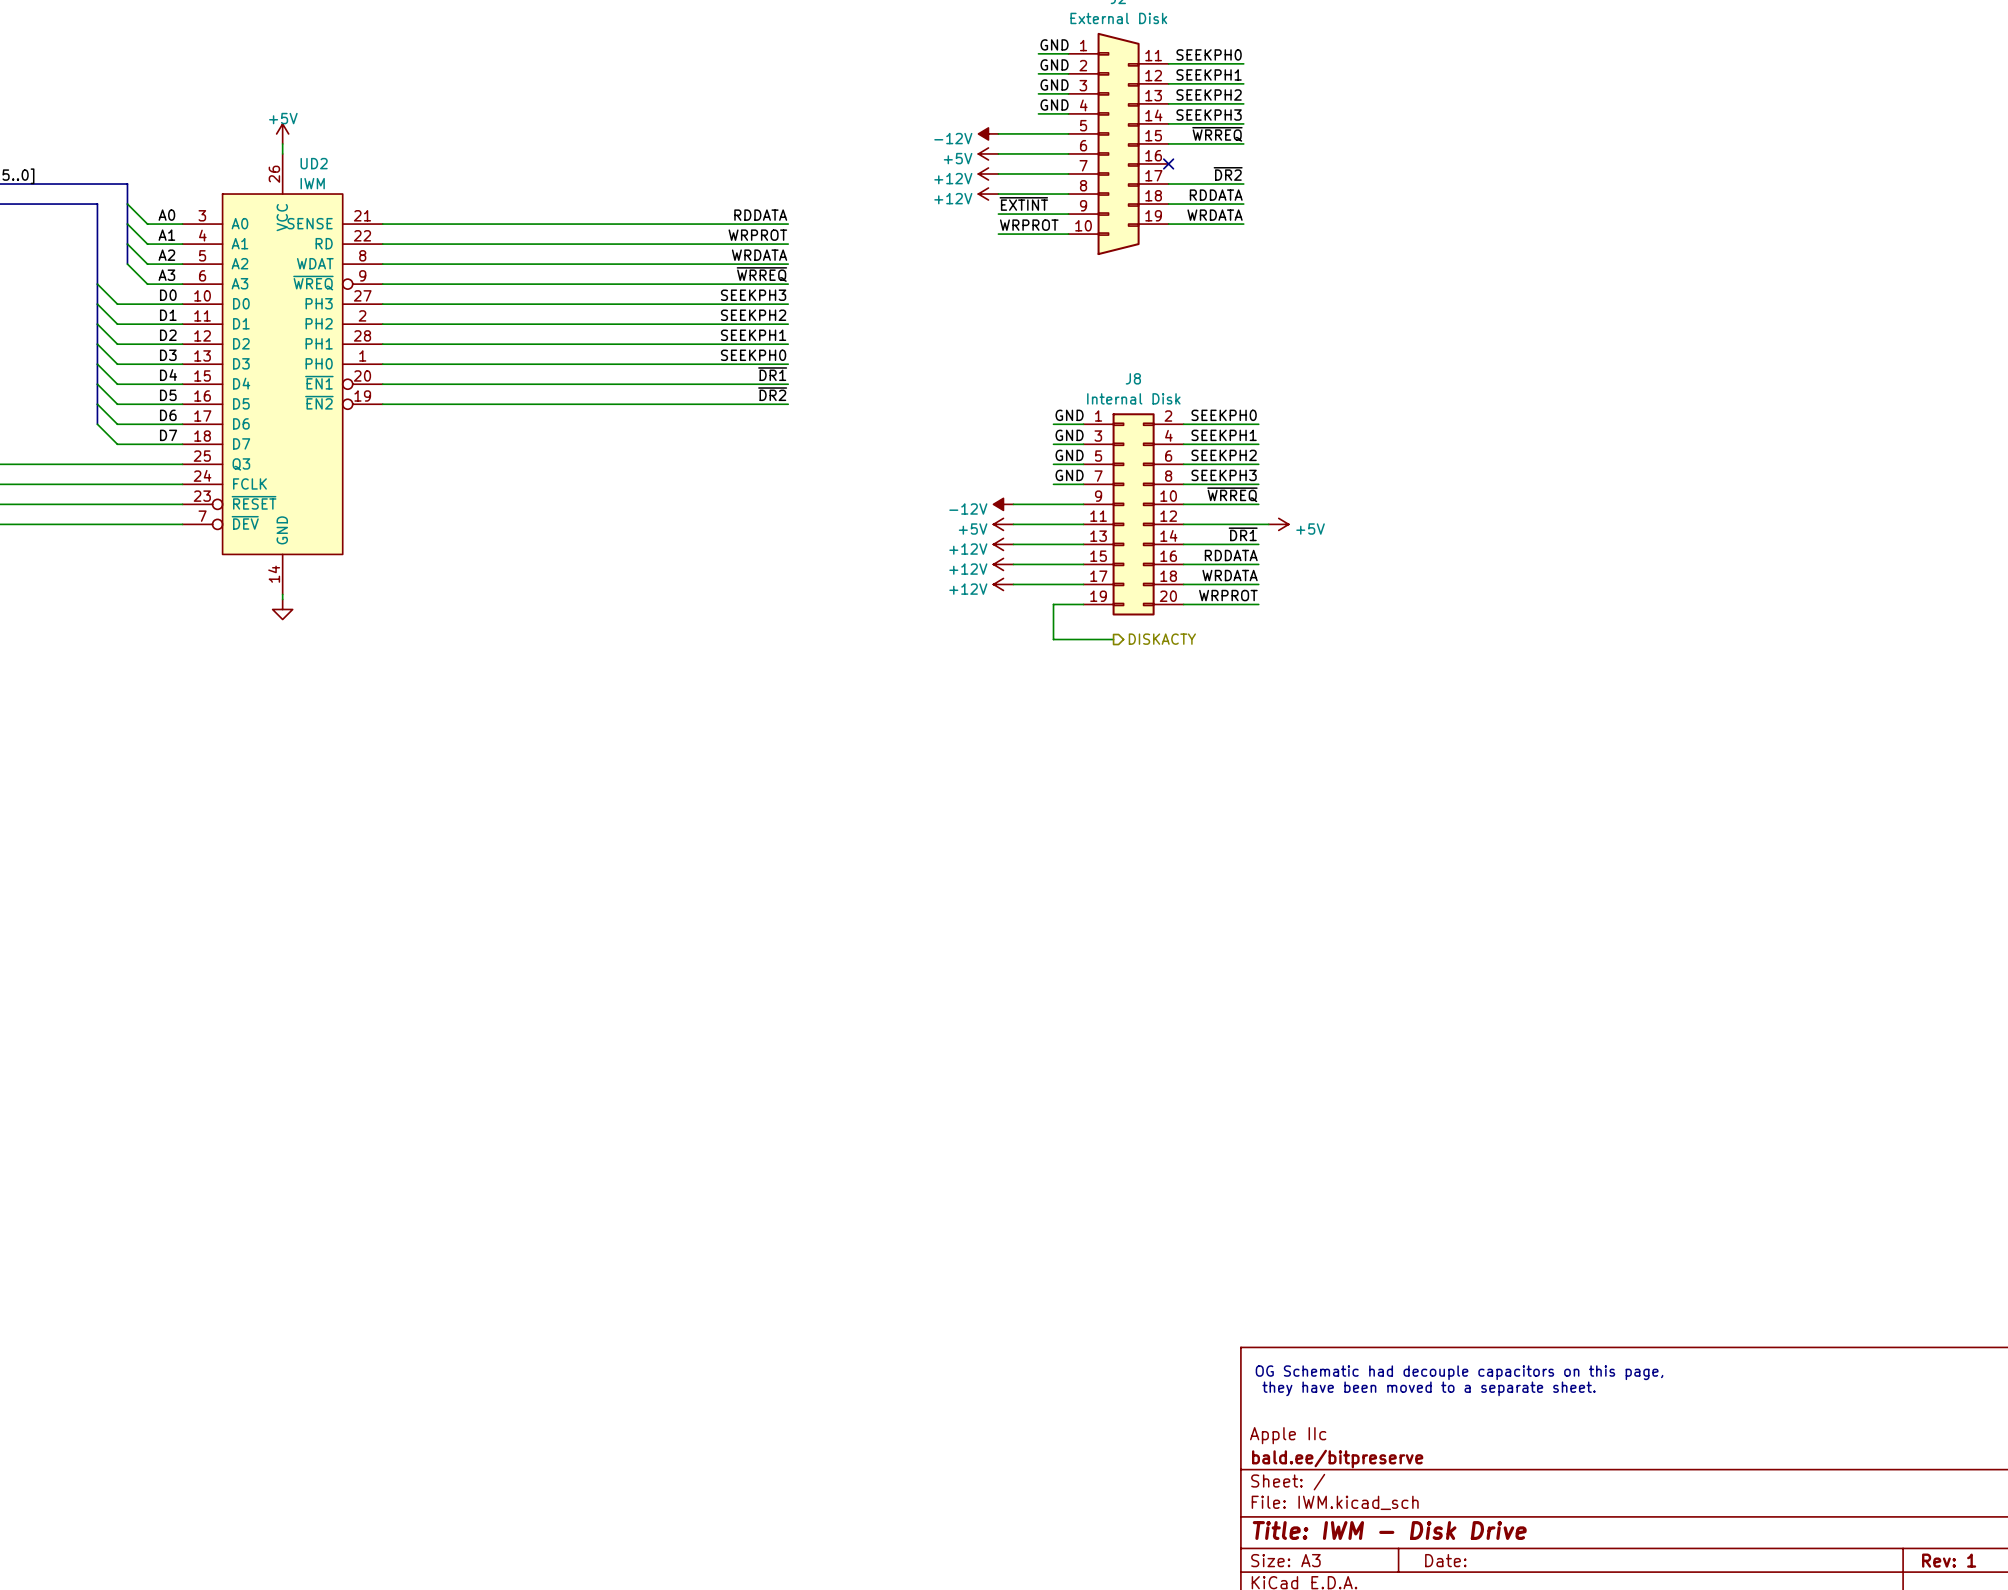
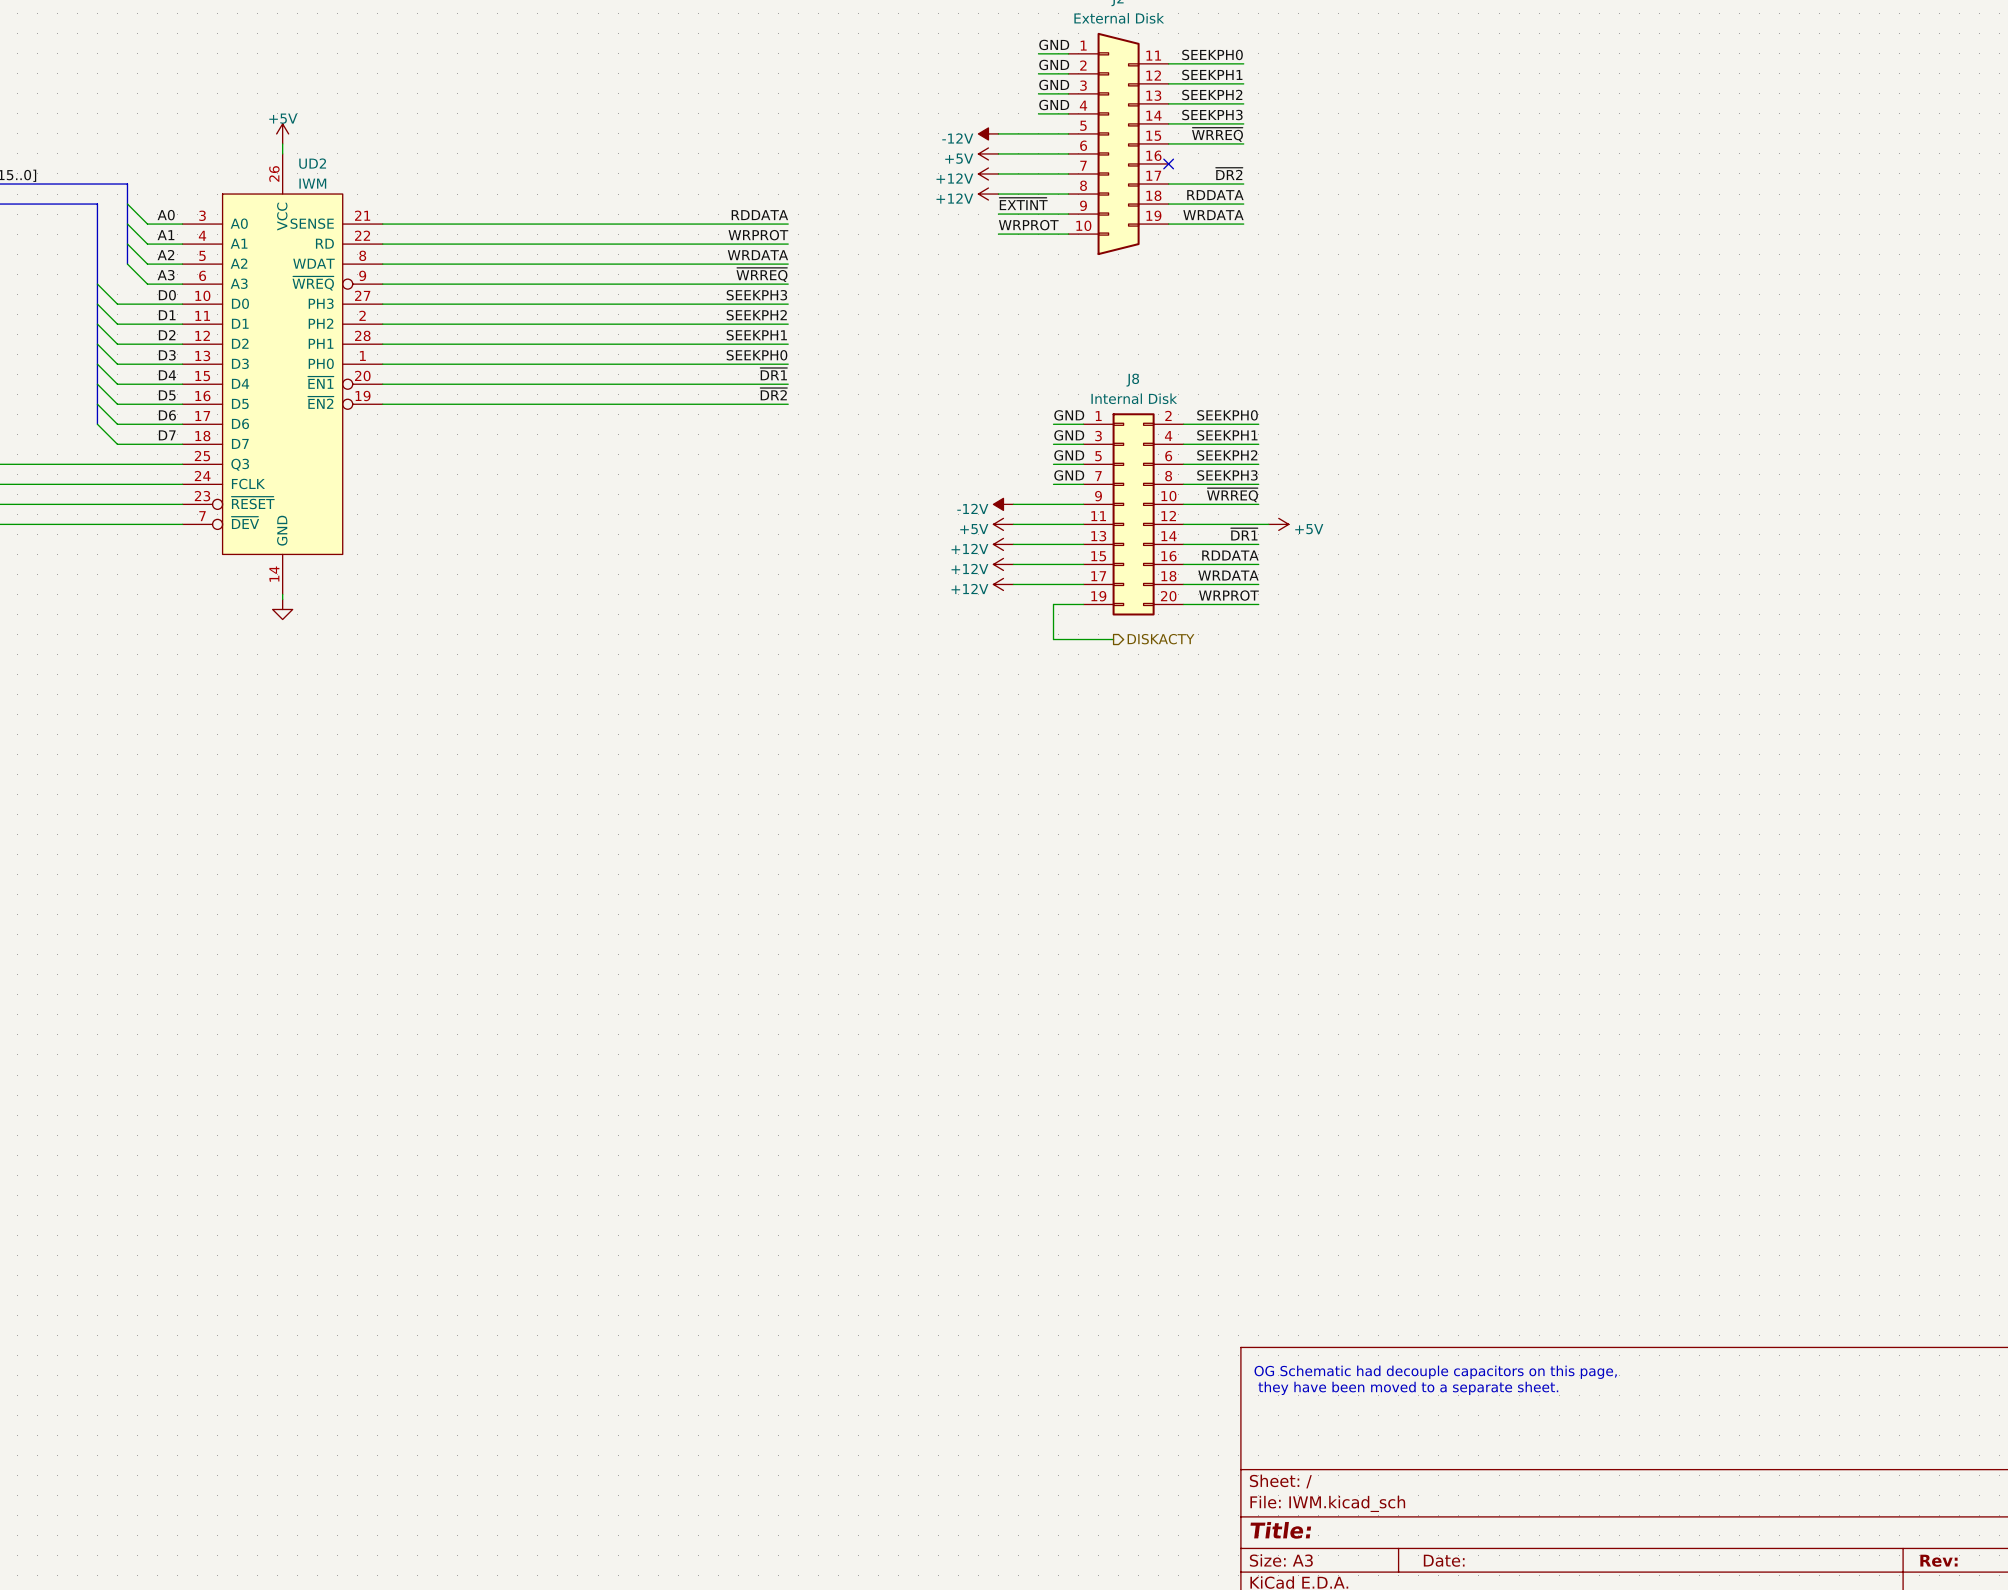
title block: Apple IIc (1288, 1435) -> none
title block: bald.ee/bitpreserve (1337, 1459) -> none
title block: Title: IWM - Disk Drive (1389, 1530) -> Title: (1280, 1530)
title block: Rev: 1 (1949, 1560) -> Rev: (1938, 1560)

